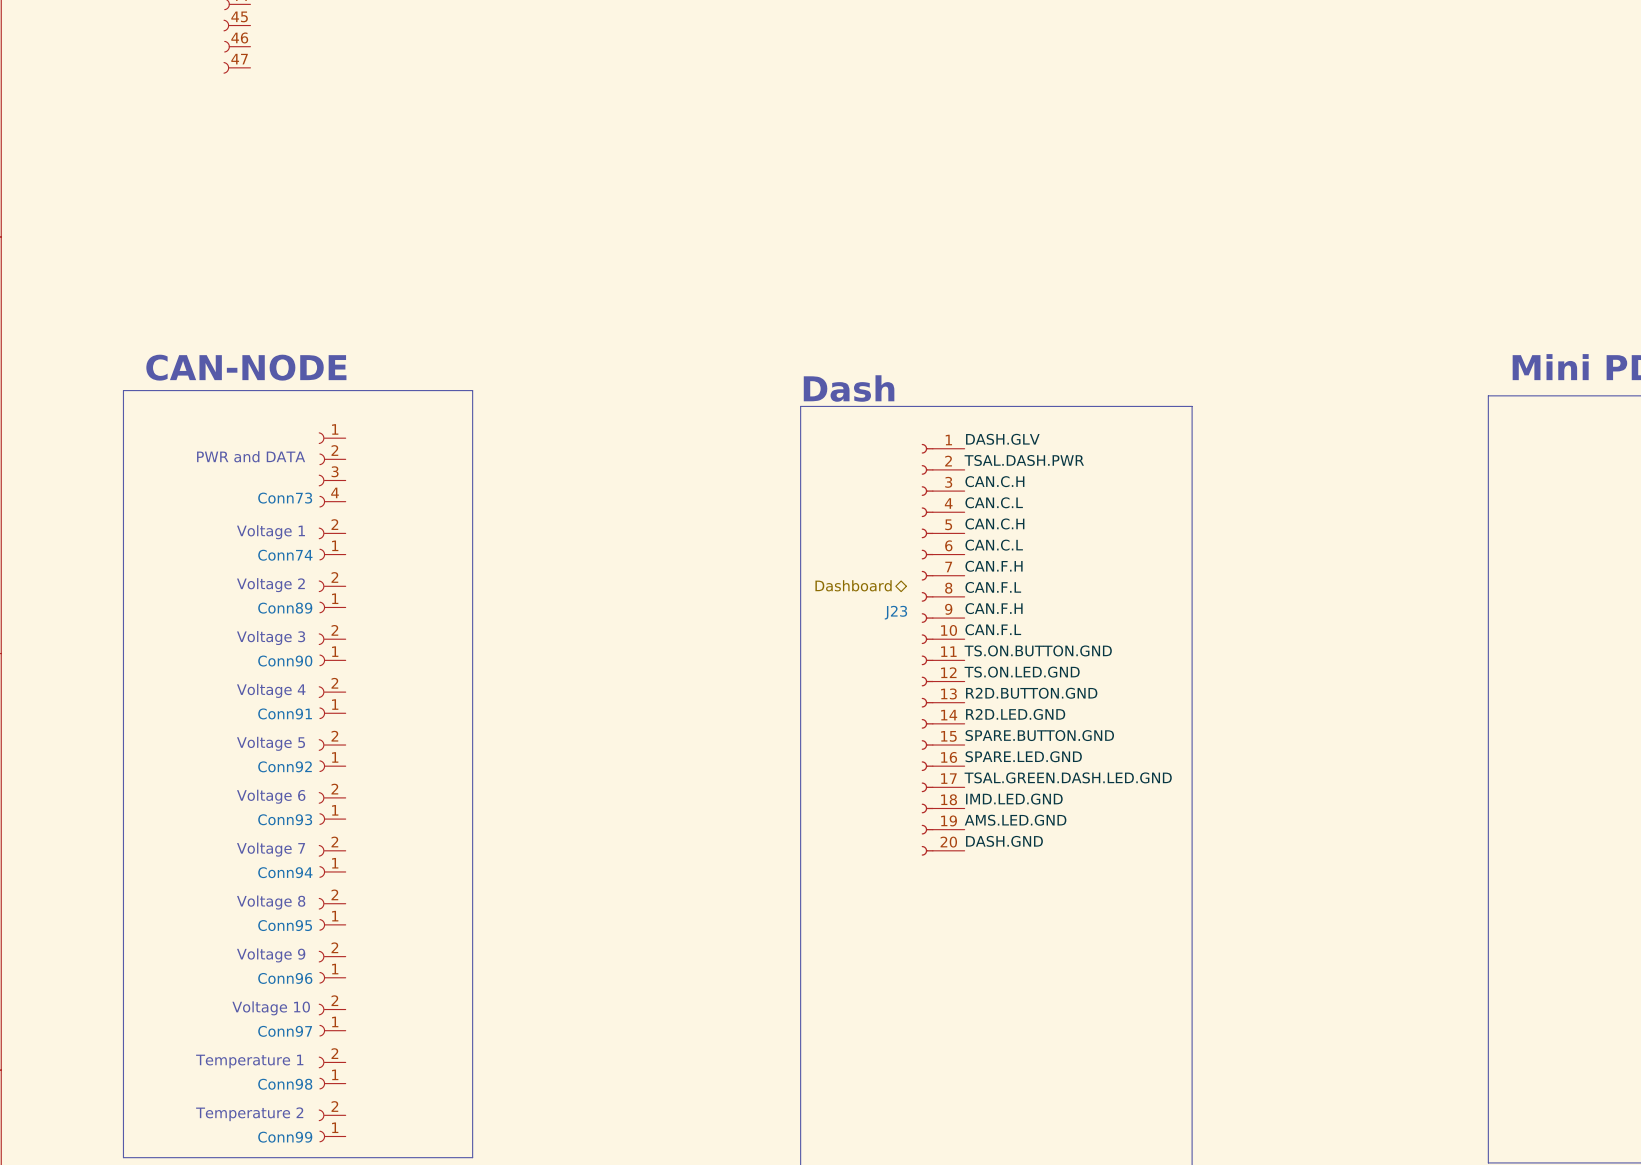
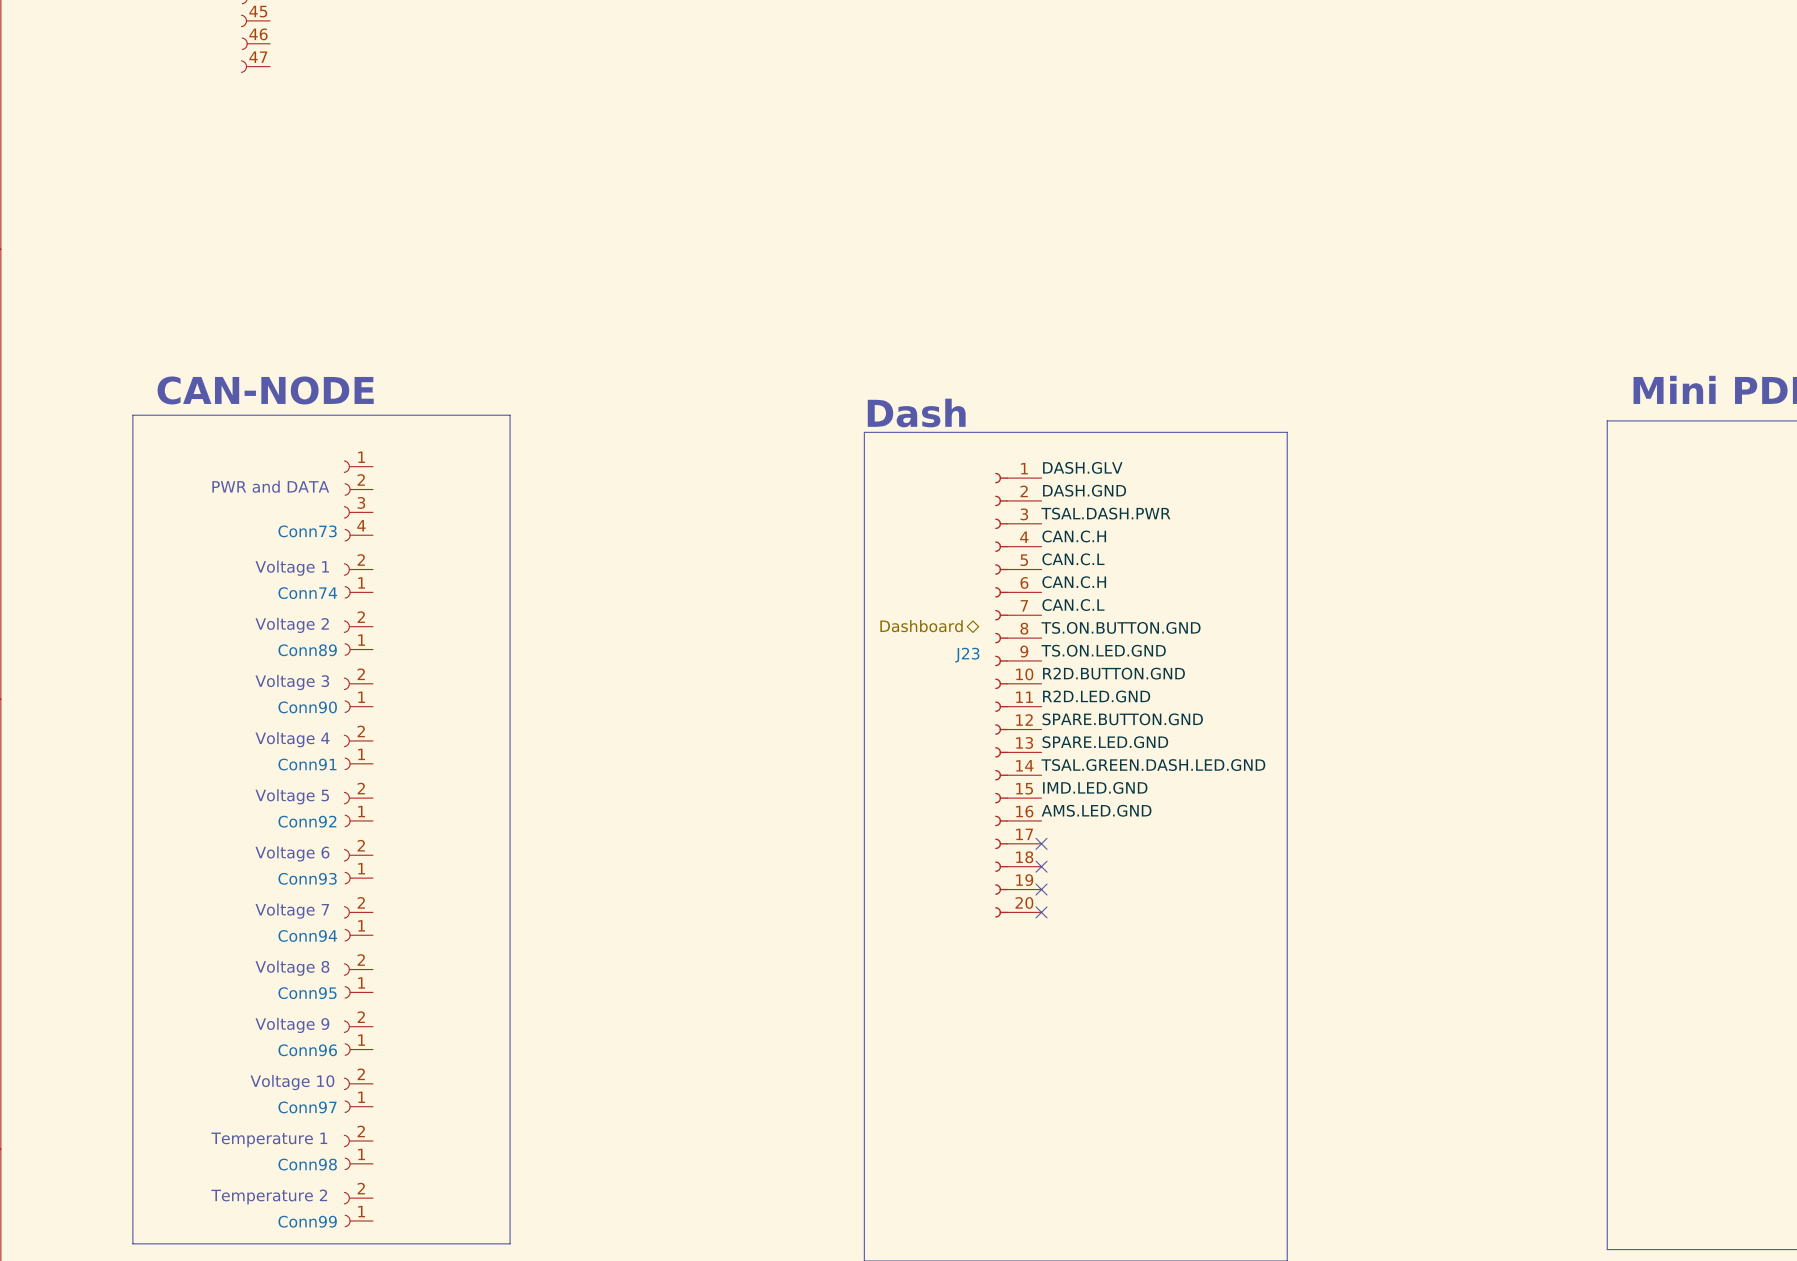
label: TSAL.DASH.PWR (1024, 460) -> DASH.GND (1084, 490)
label: CAN.C.H (994, 481) -> TSAL.DASH.PWR (1105, 513)
label: CAN.C.L (994, 502) -> CAN.C.H (1074, 536)
label: CAN.C.H (994, 523) -> CAN.C.L (1073, 559)
label: CAN.C.L (994, 545) -> CAN.C.H (1074, 582)
label: CAN.F.H (994, 566) -> CAN.C.L (1073, 605)
label: CAN.F.L (993, 587) -> TS.ON.BUTTON.GND (1121, 627)
label: CAN.F.H (994, 608) -> TS.ON.LED.GND (1103, 650)
label: CAN.F.L (993, 629) -> R2D.BUTTON.GND (1113, 673)
label: TS.ON.BUTTON.GND (1038, 650) -> R2D.LED.GND (1096, 696)
label: TS.ON.LED.GND (1022, 672) -> SPARE.BUTTON.GND (1122, 719)
label: R2D.BUTTON.GND (1031, 693) -> SPARE.LED.GND (1105, 742)
label: R2D.LED.GND (1015, 714) -> TSAL.GREEN.DASH.LED.GND (1153, 765)
label: SPARE.BUTTON.GND (1039, 735) -> IMD.LED.GND (1095, 787)
label: SPARE.LED.GND (1023, 756) -> AMS.LED.GND (1096, 810)
label: TSAL.GREEN.DASH.LED.GND (1068, 777) -> none
no-connect mark: none -> (1041, 843)
label: IMD.LED.GND (1014, 799) -> none
no-connect mark: none -> (1041, 866)
label: AMS.LED.GND (1015, 820) -> none
no-connect mark: none -> (1041, 889)
label: DASH.GND (1004, 841) -> none
no-connect mark: none -> (1041, 912)

